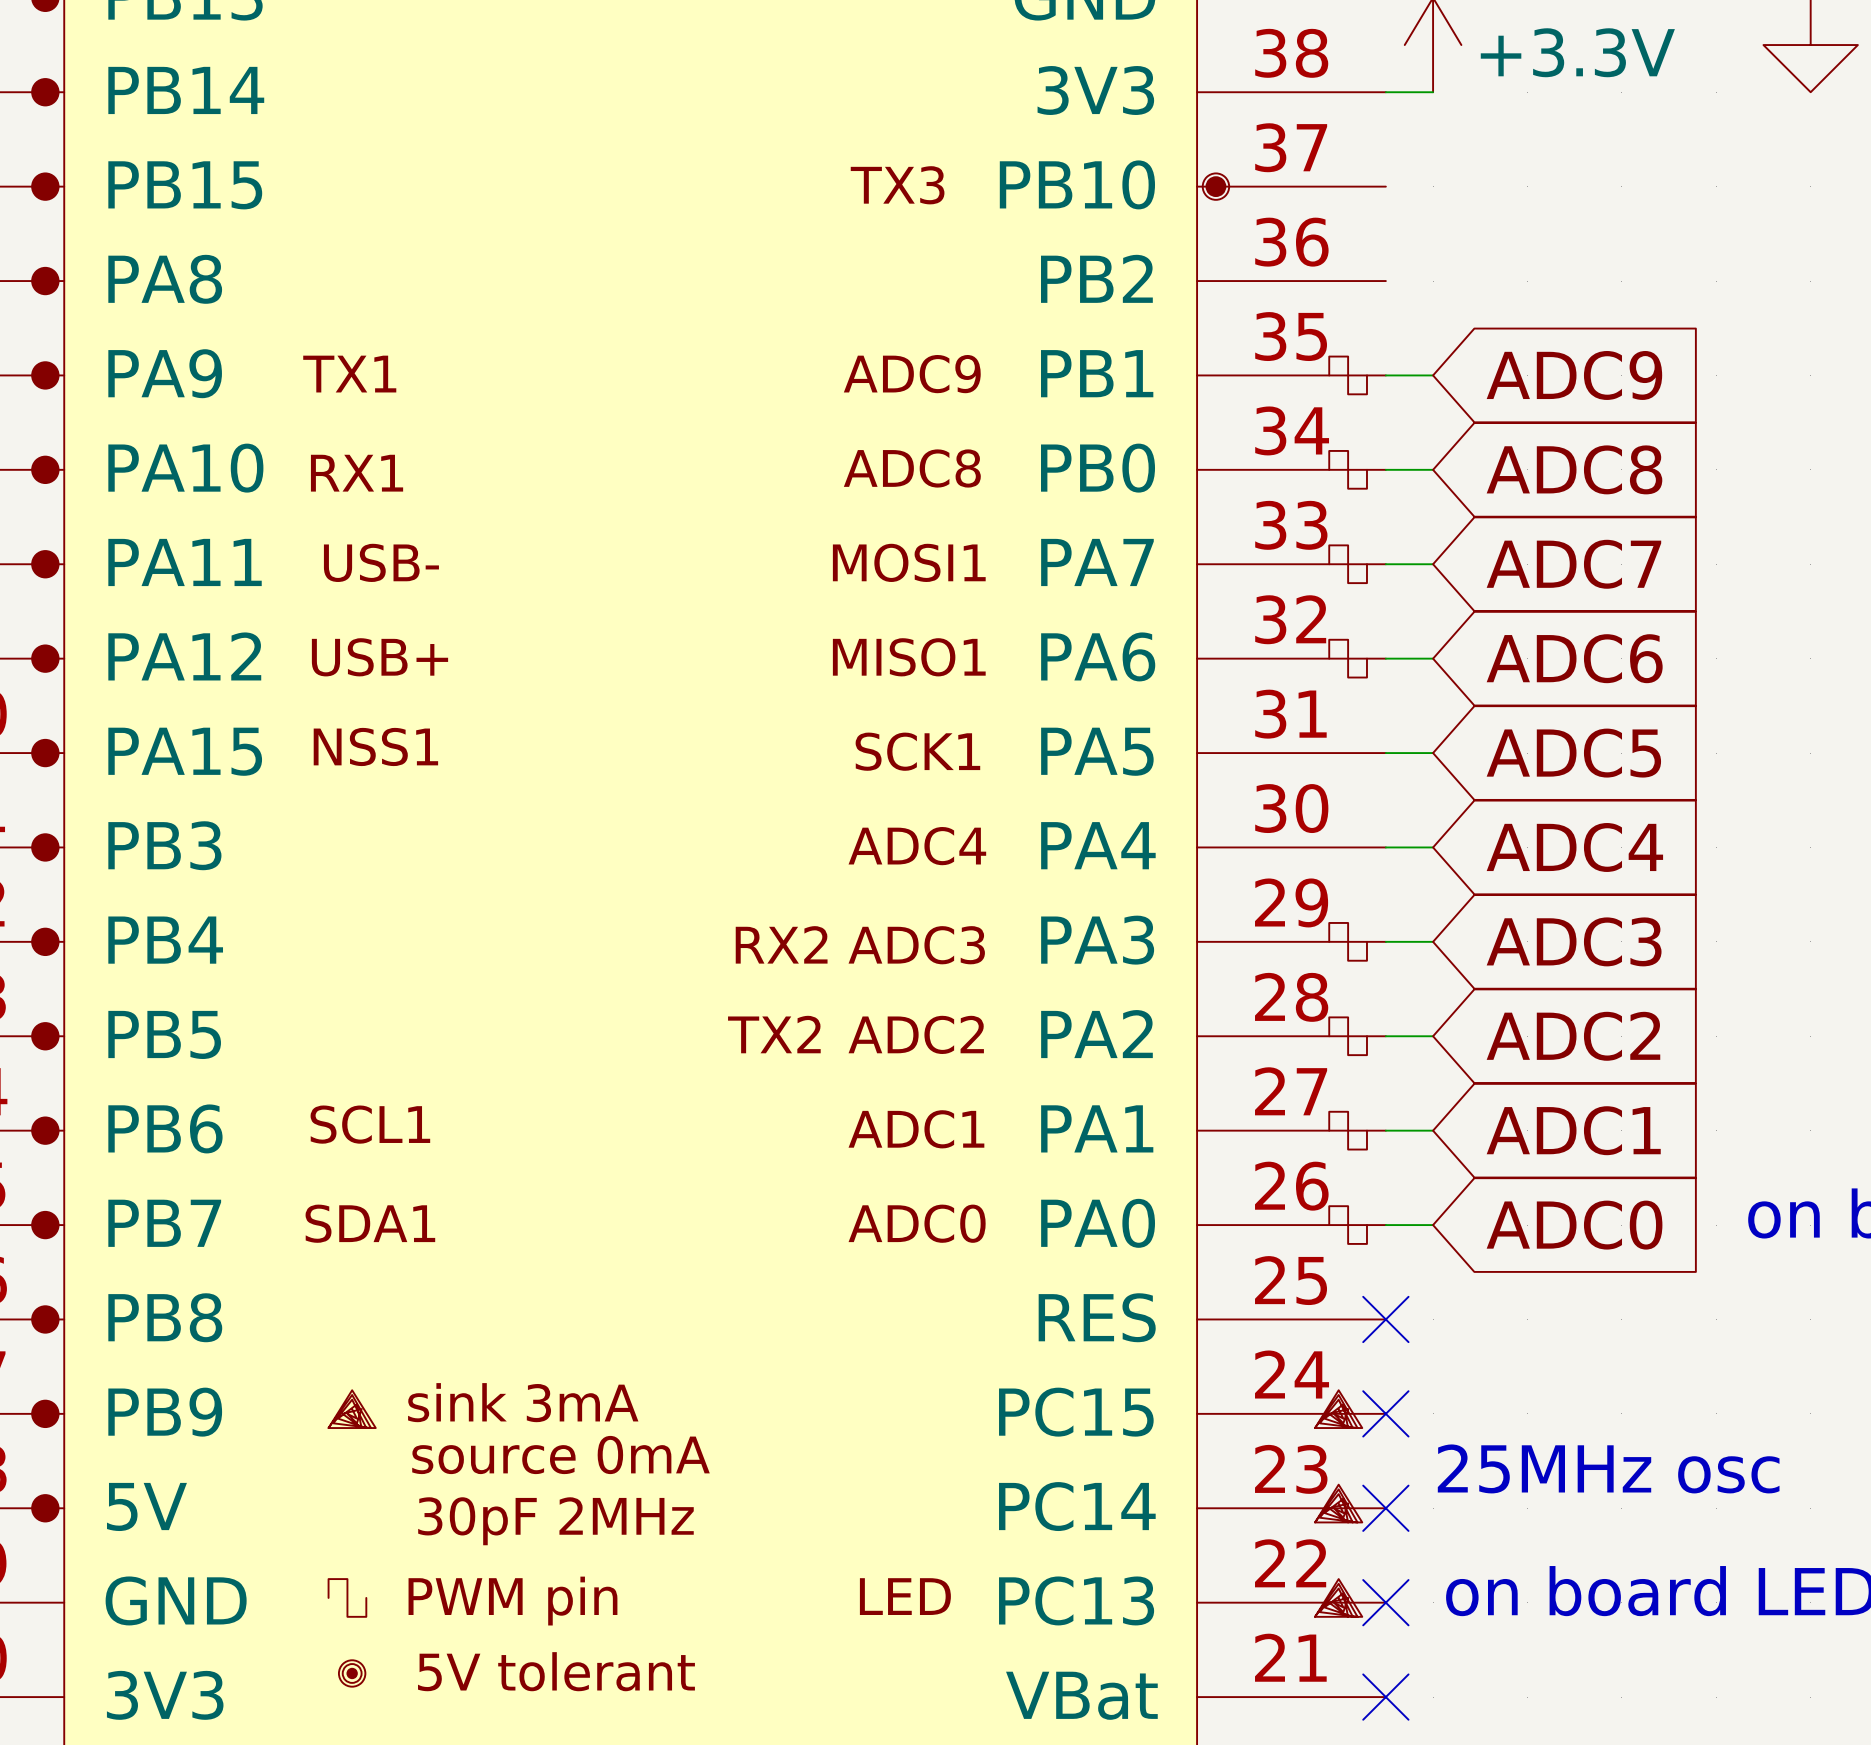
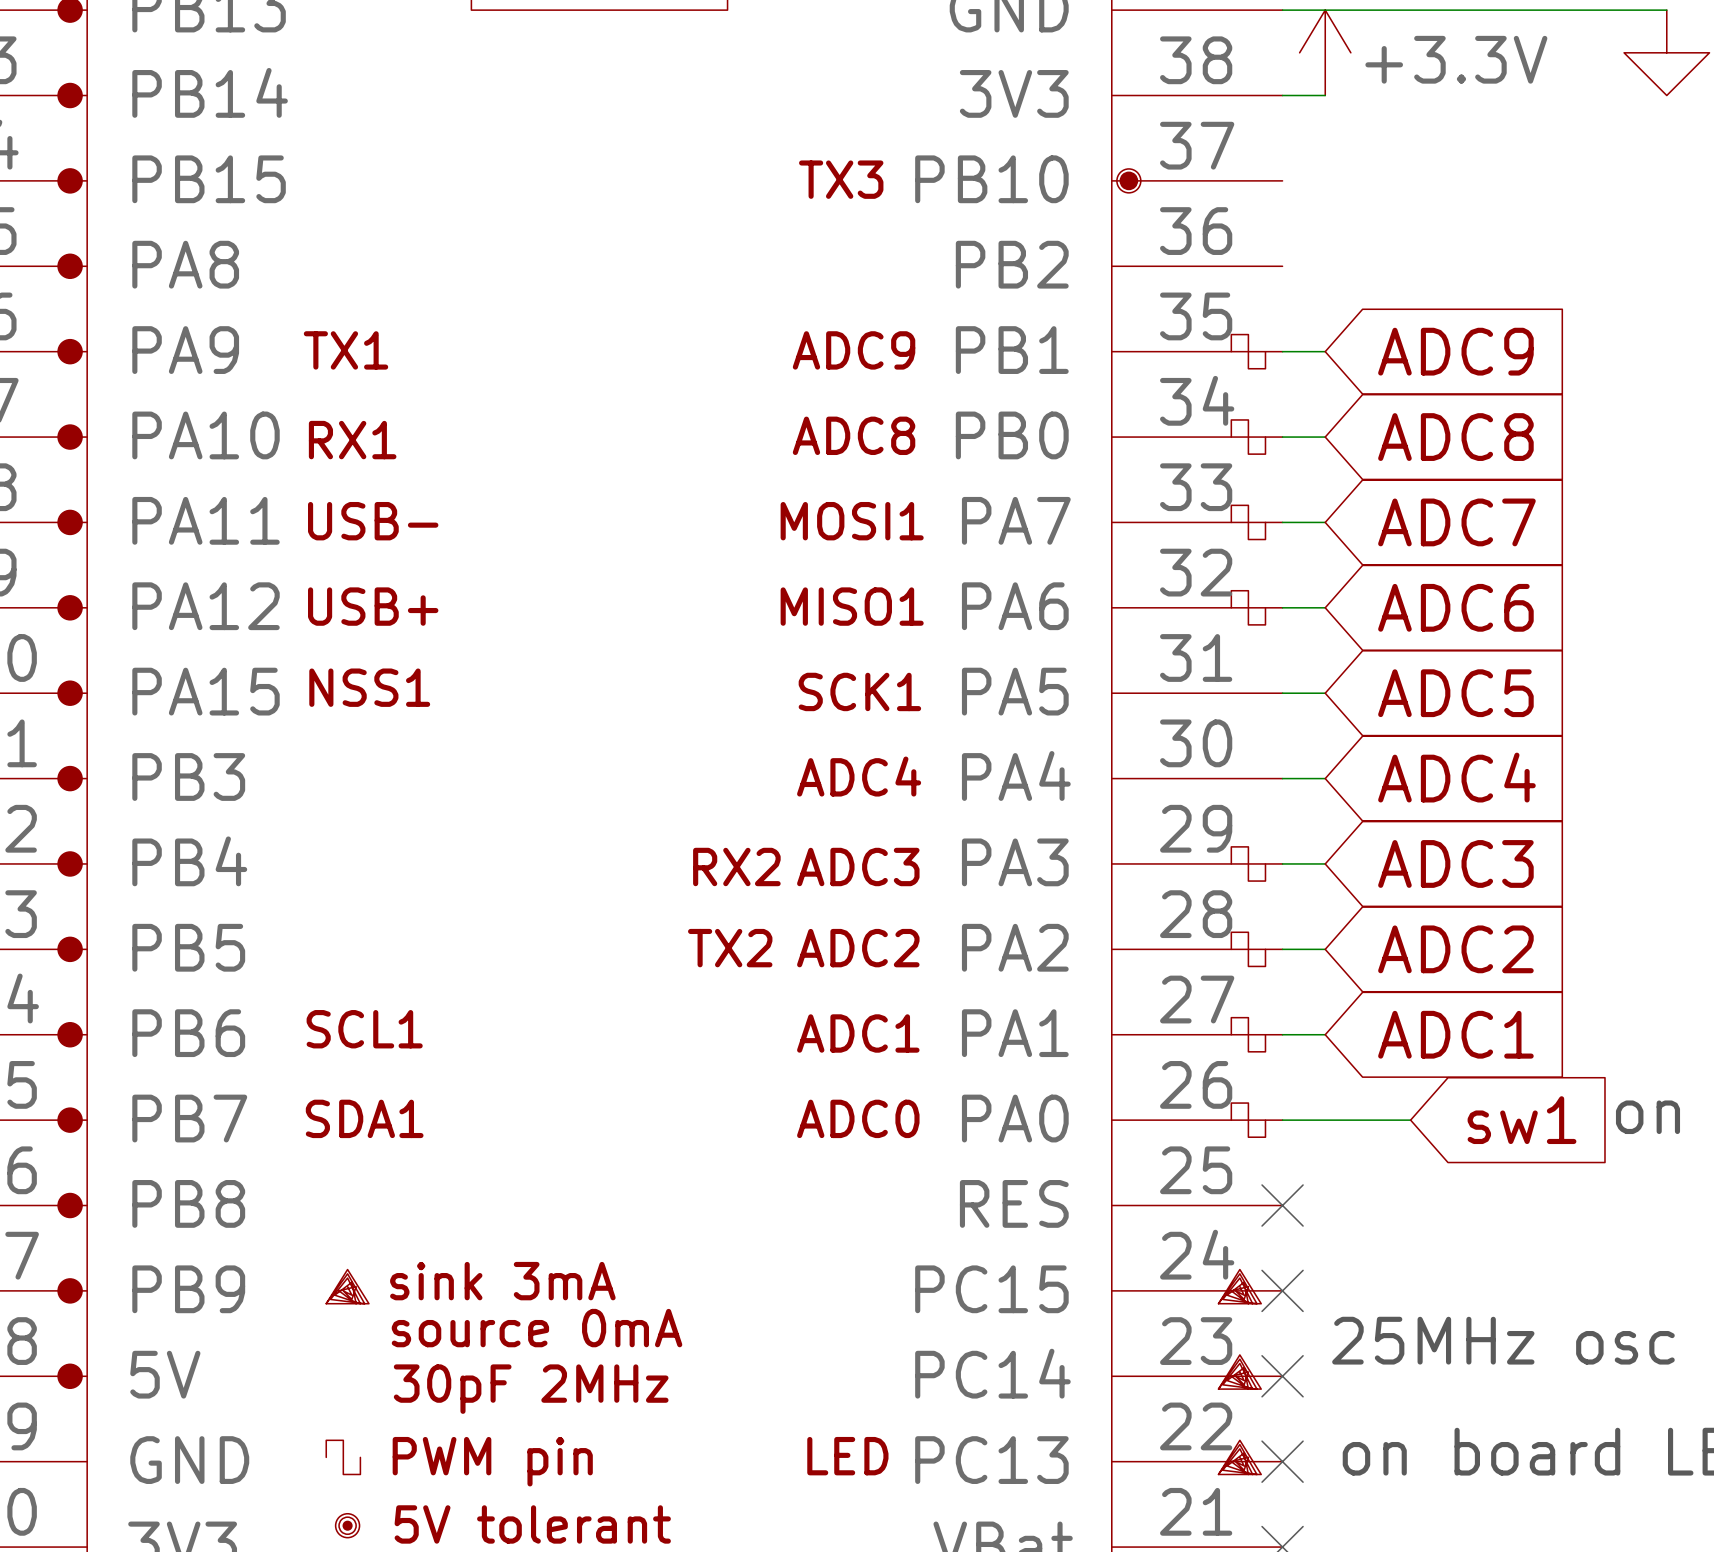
wire: none -> (1325, 1120) (1410, 1120)
global label: ADC0 (1574, 1225) -> none
global label: none -> sw1 (1522, 1120)

